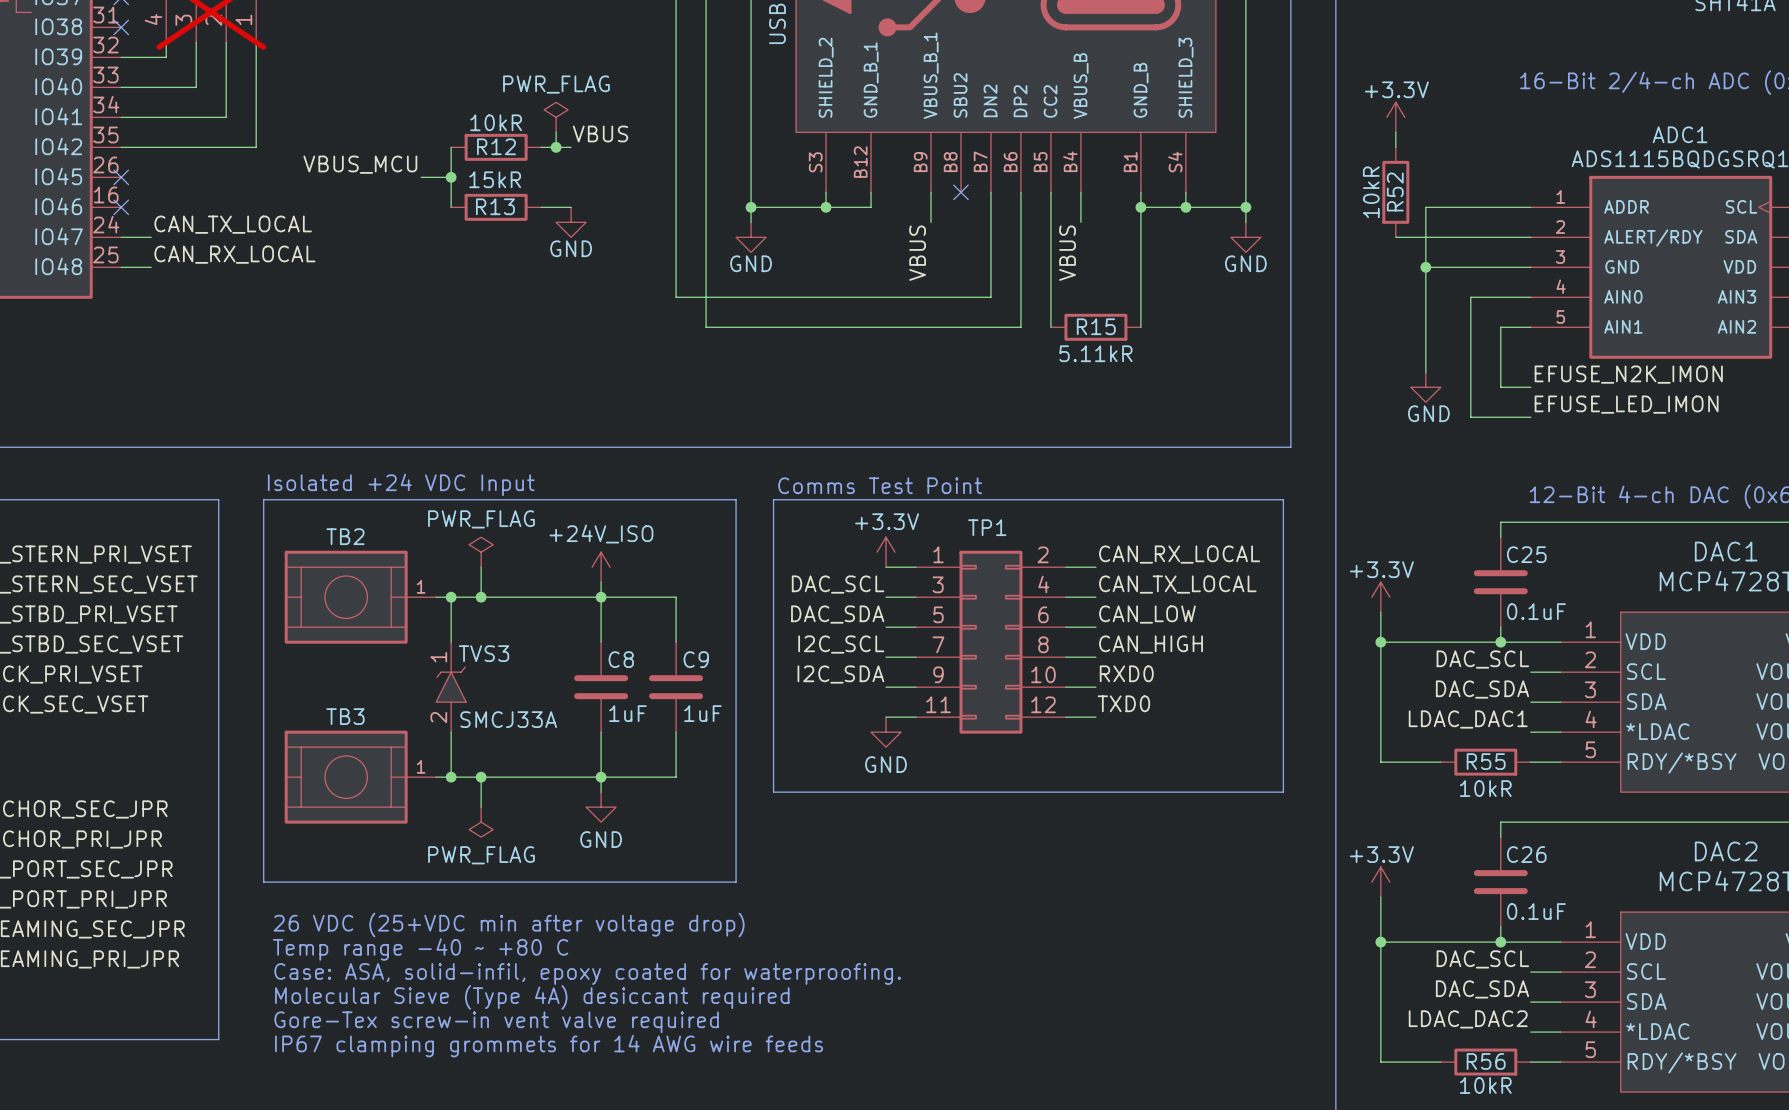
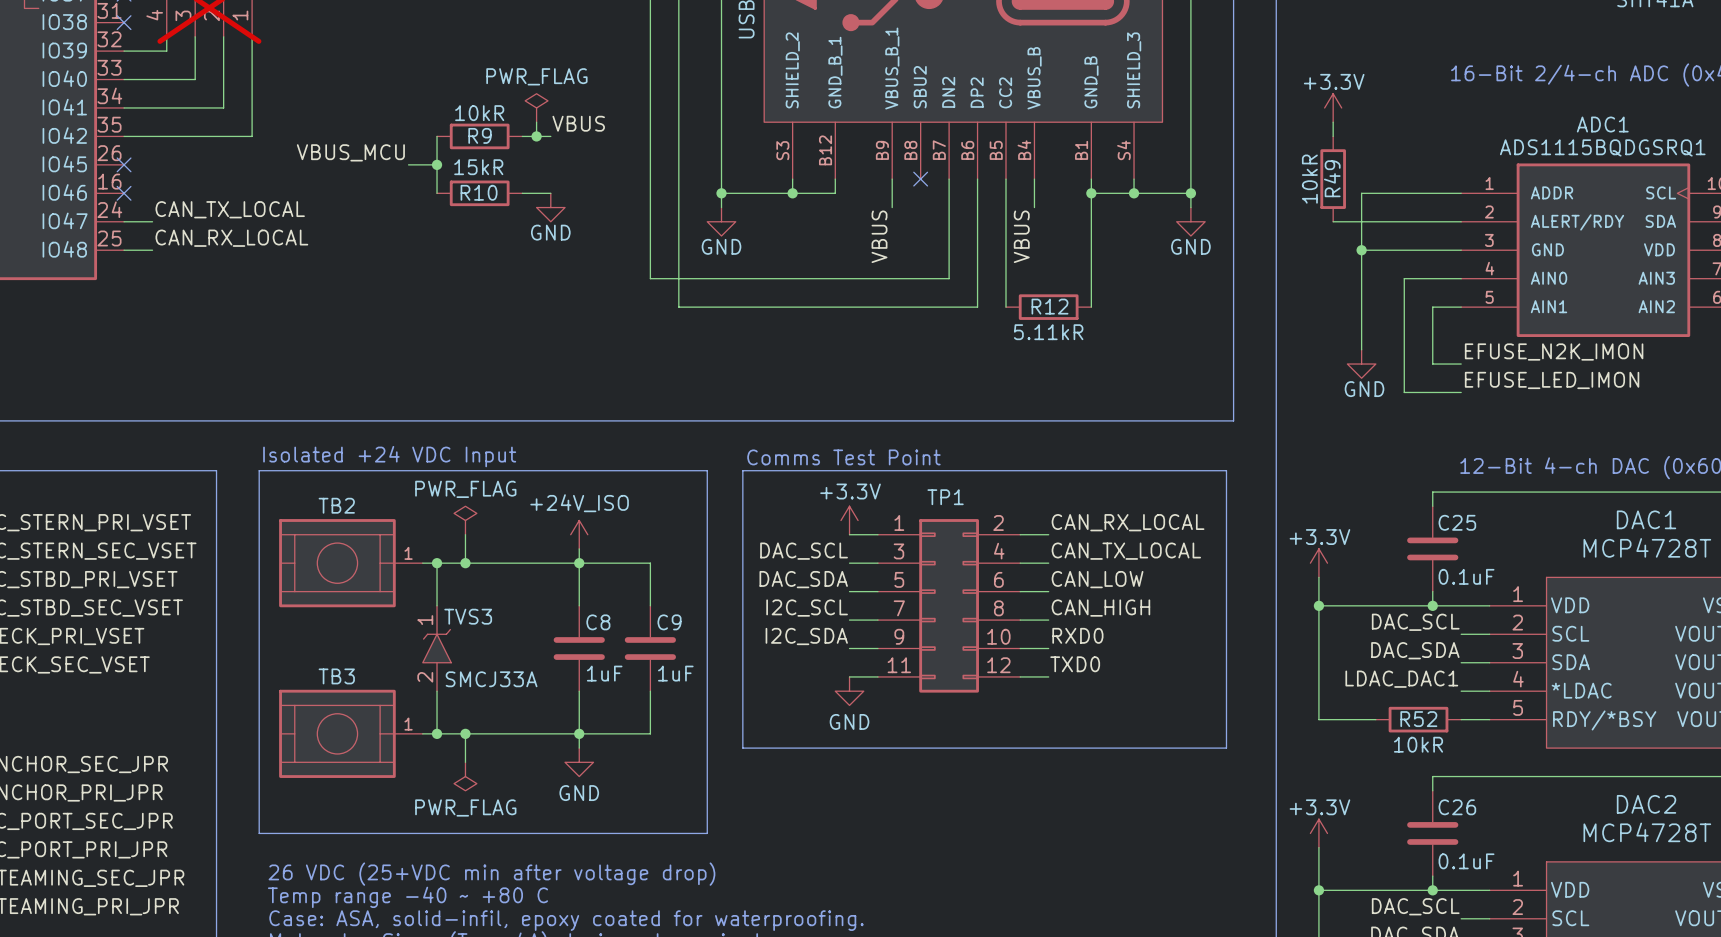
R12 name: R12 (496, 146) -> R9 (480, 135)
R52 name: R52 (1395, 191) -> R49 (1332, 178)
R13 name: R13 (495, 206) -> R10 (479, 192)
R15 name: R15 (1096, 326) -> R12 (1049, 306)
R55 name: R55 (1486, 761) -> R52 (1418, 719)

